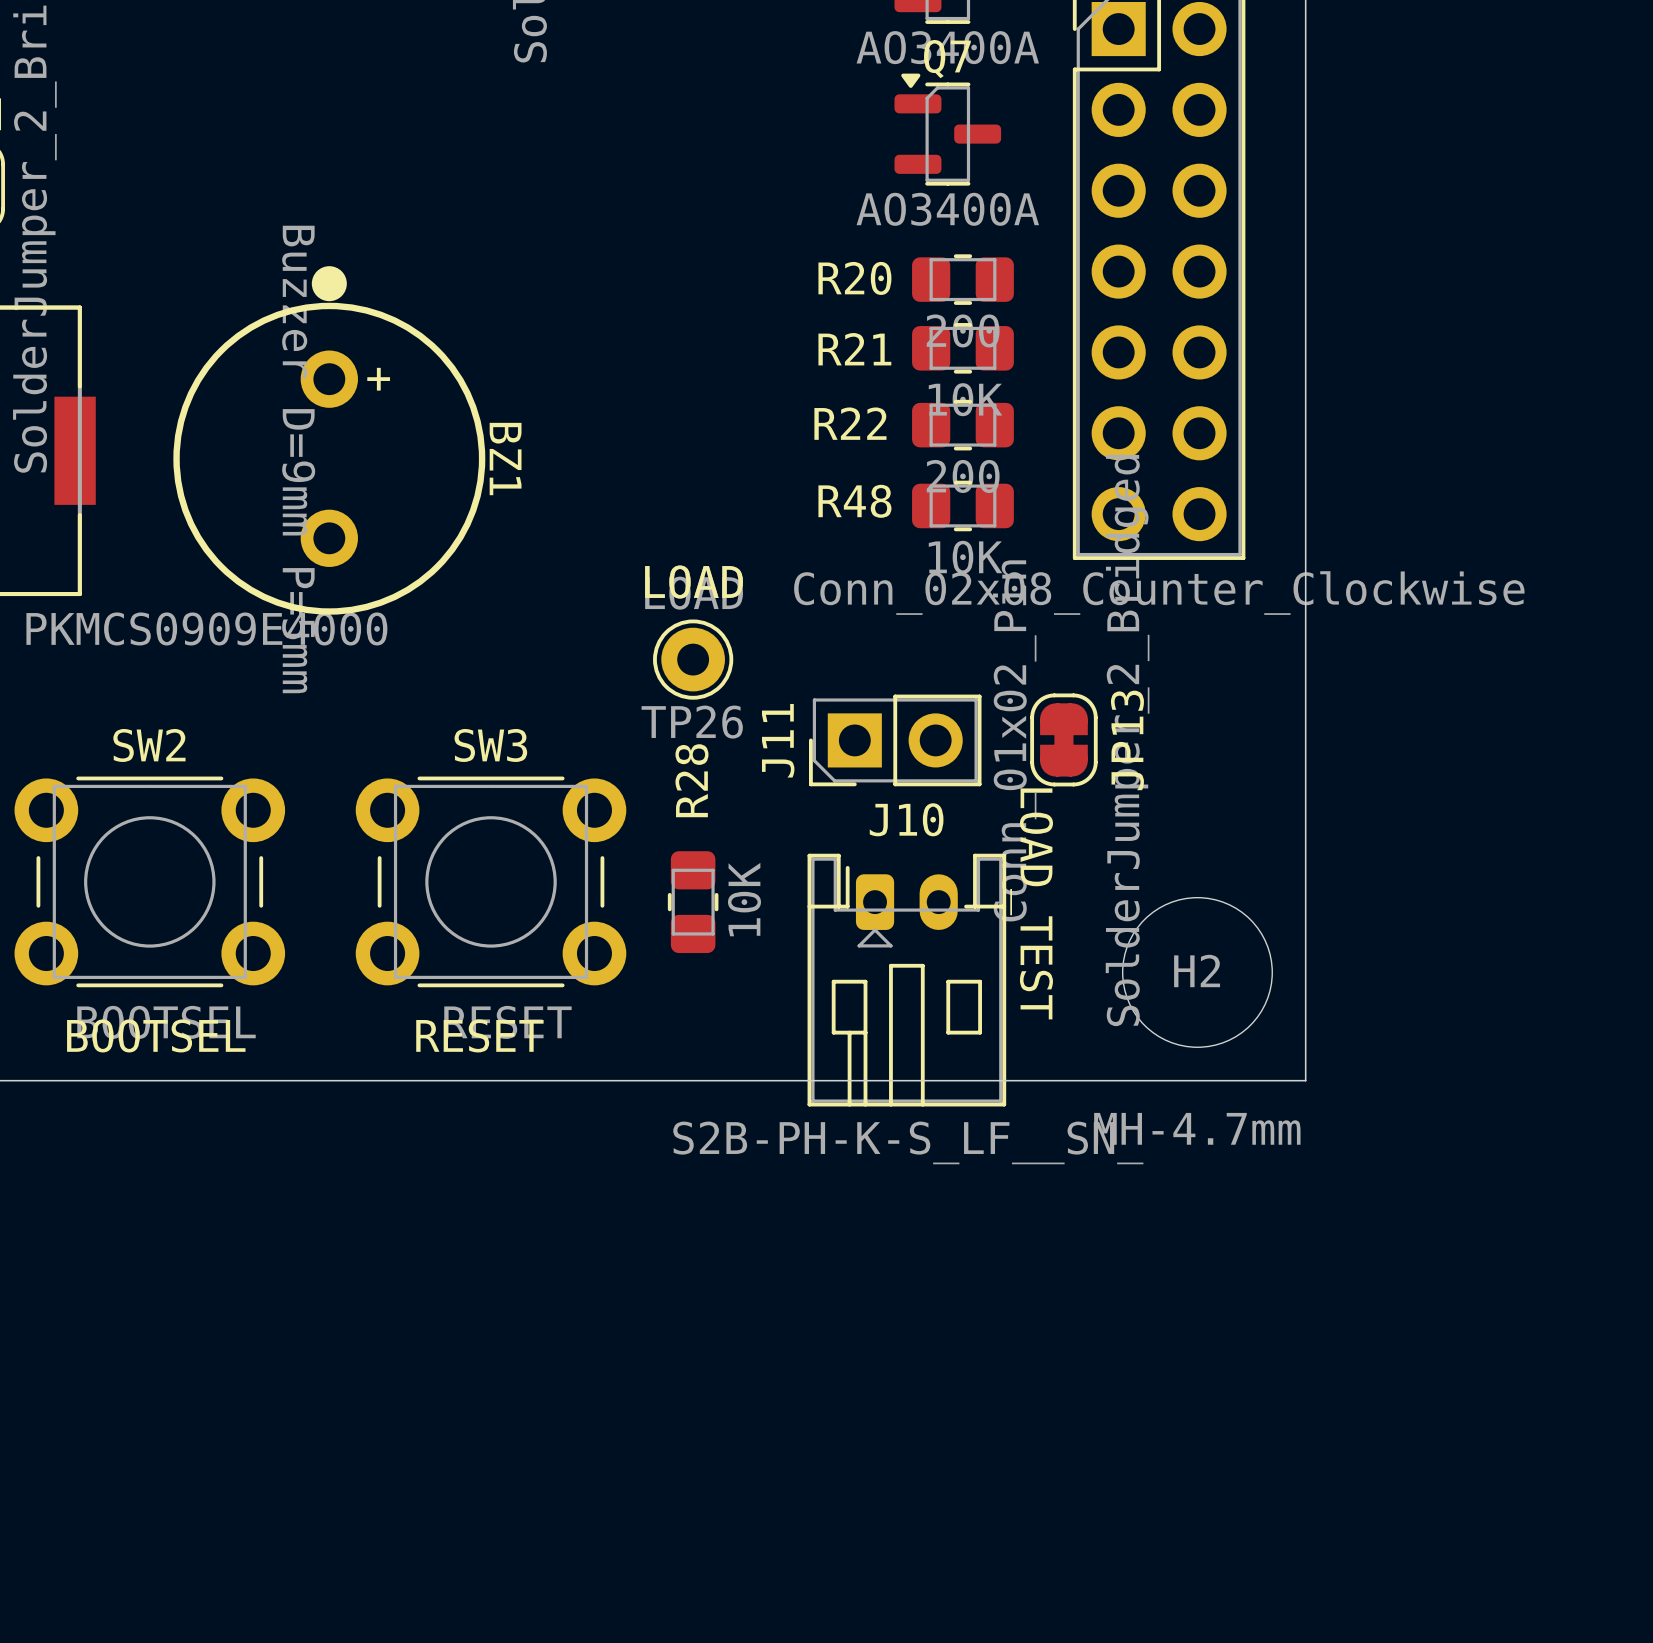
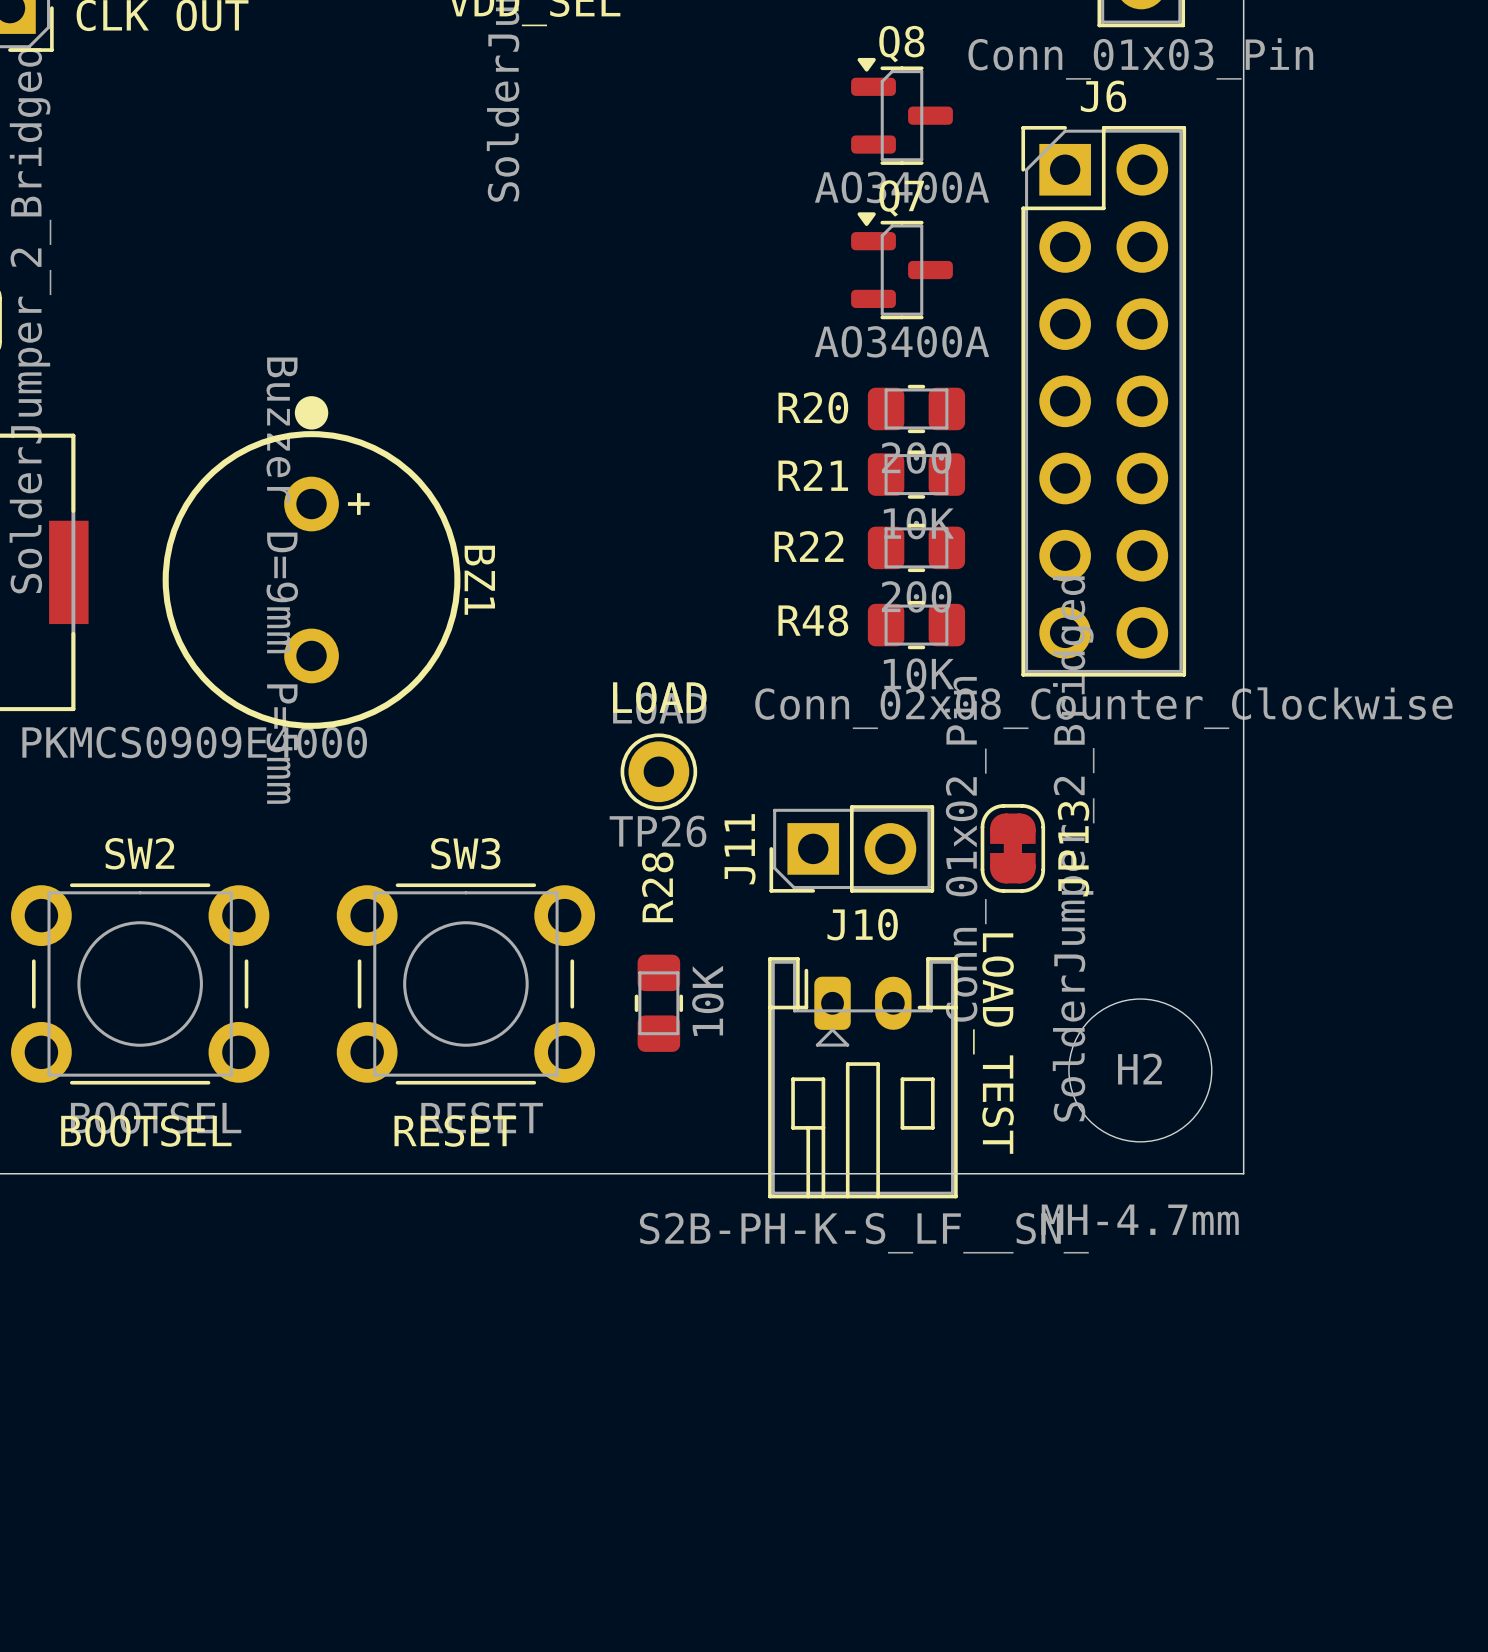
text position: LOAD_TEST (1031, 903) -> LOAD_TEST (993, 1043)

